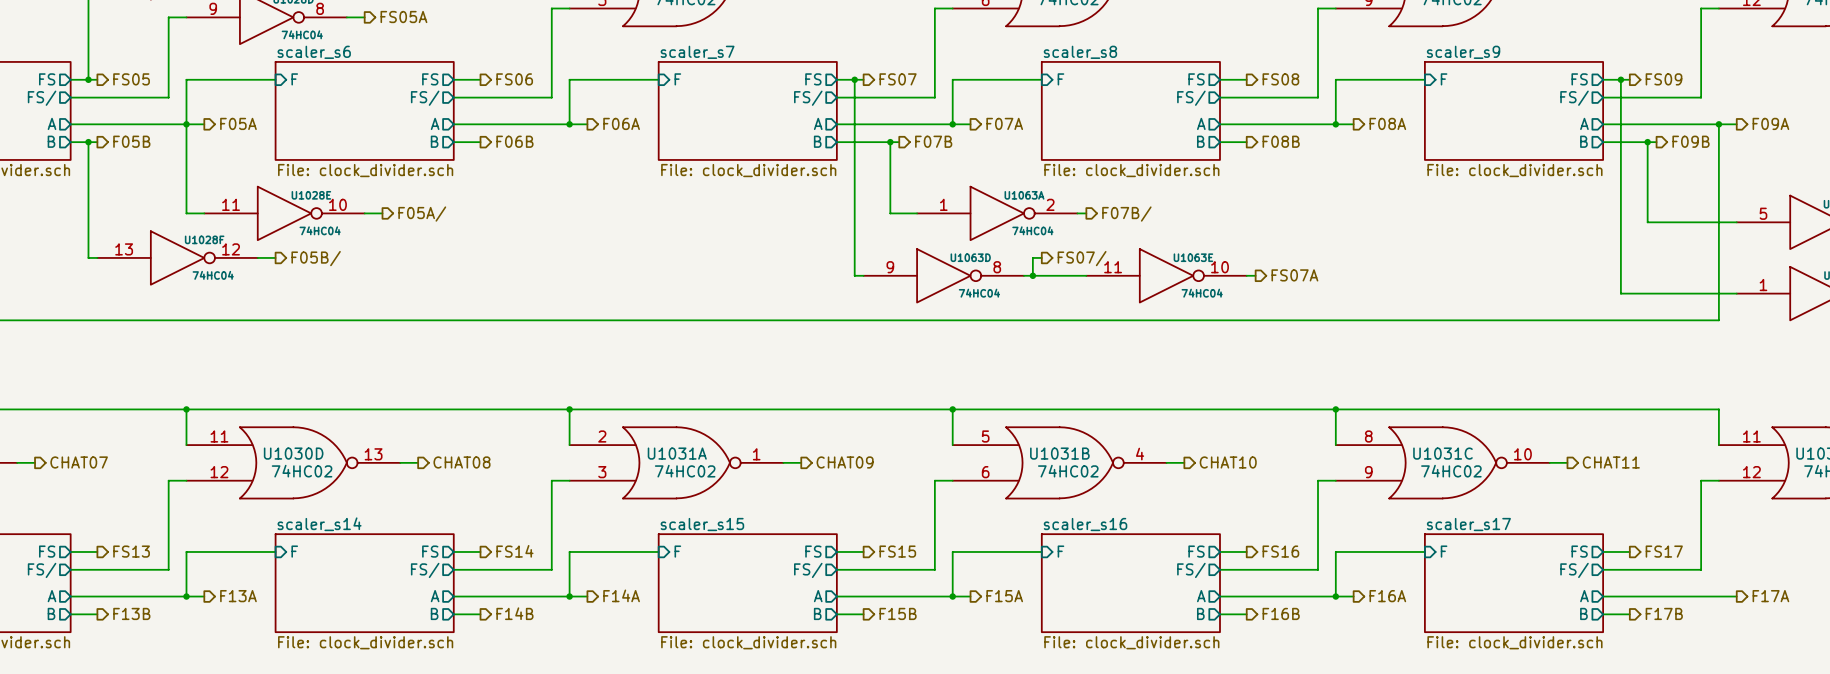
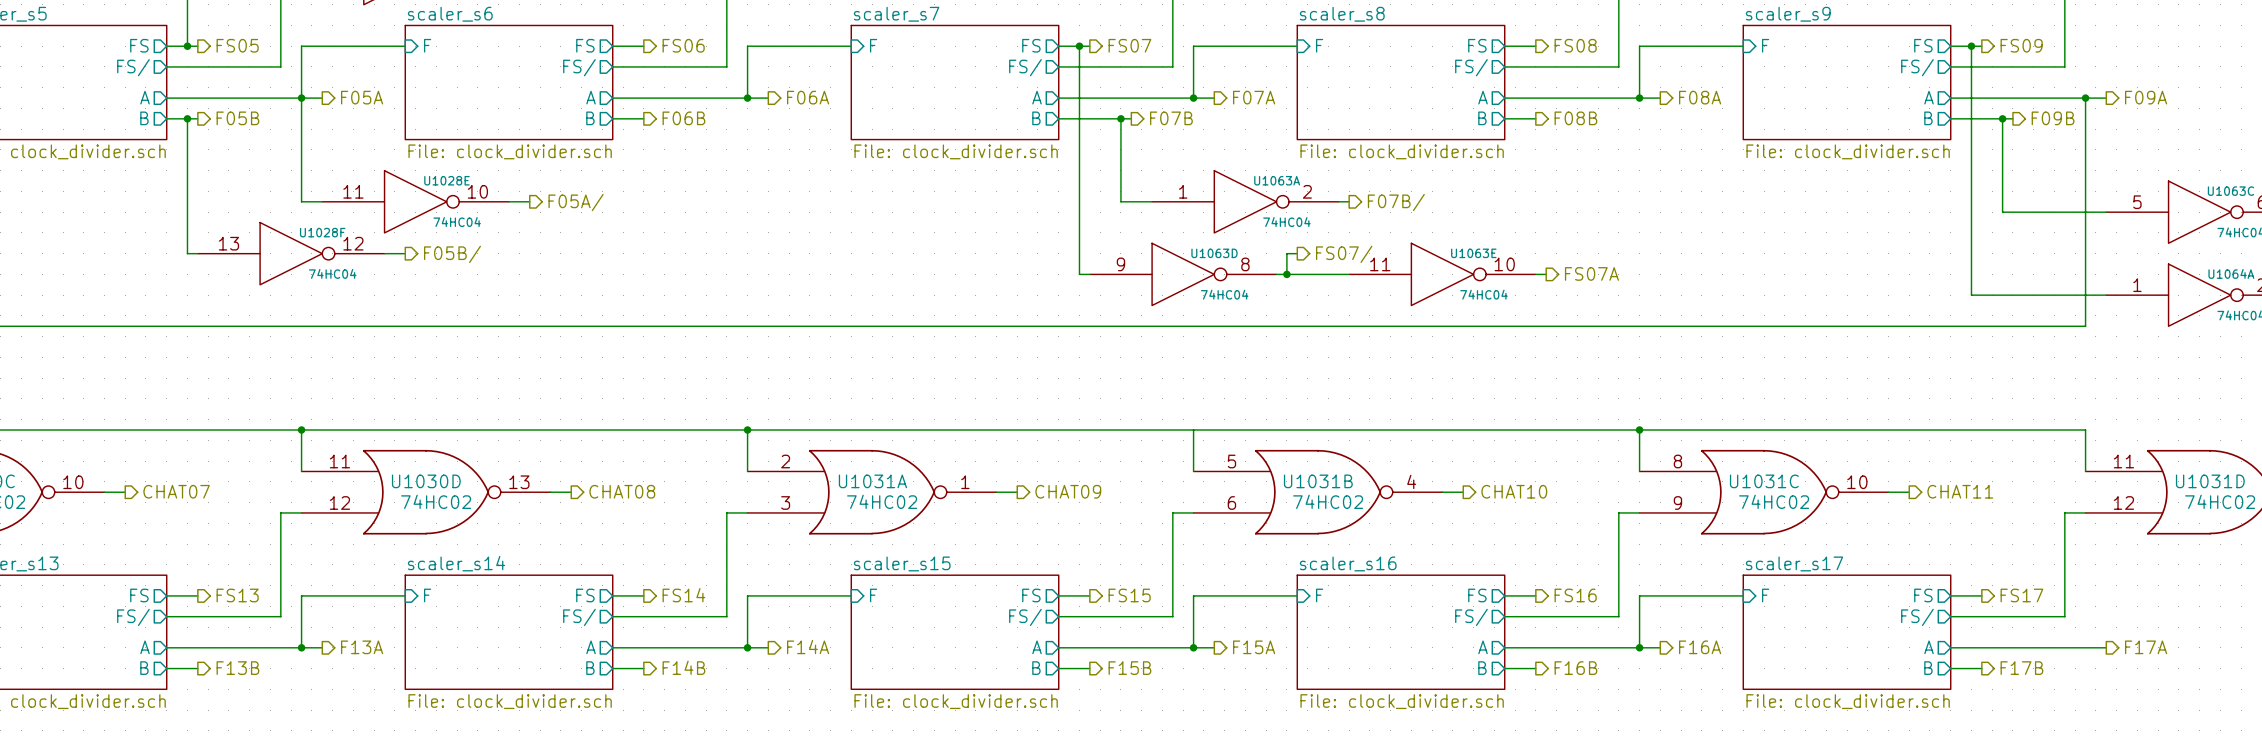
junction: (952, 409) -> none

